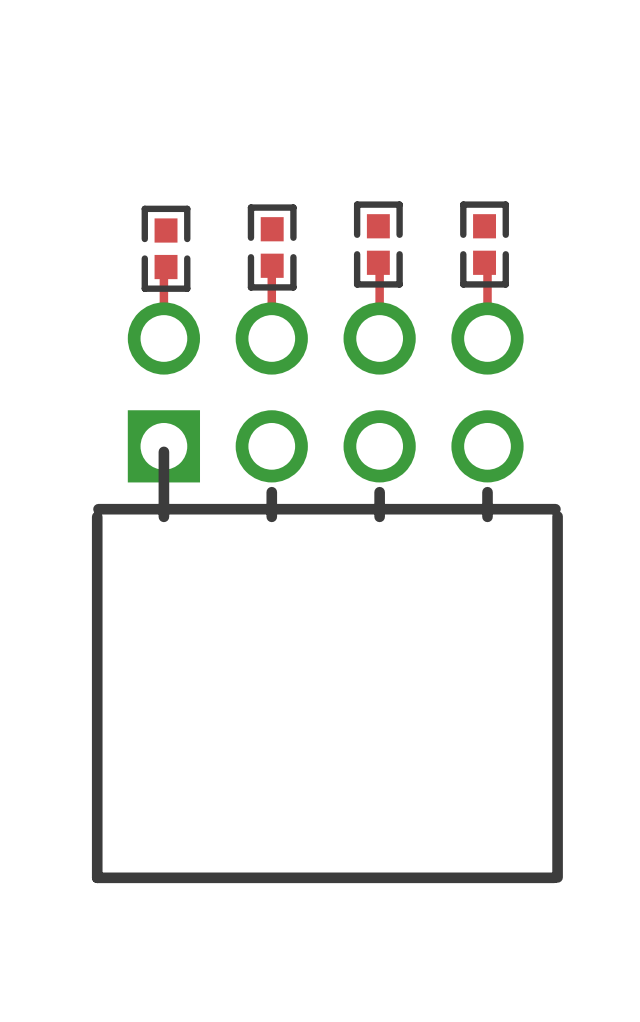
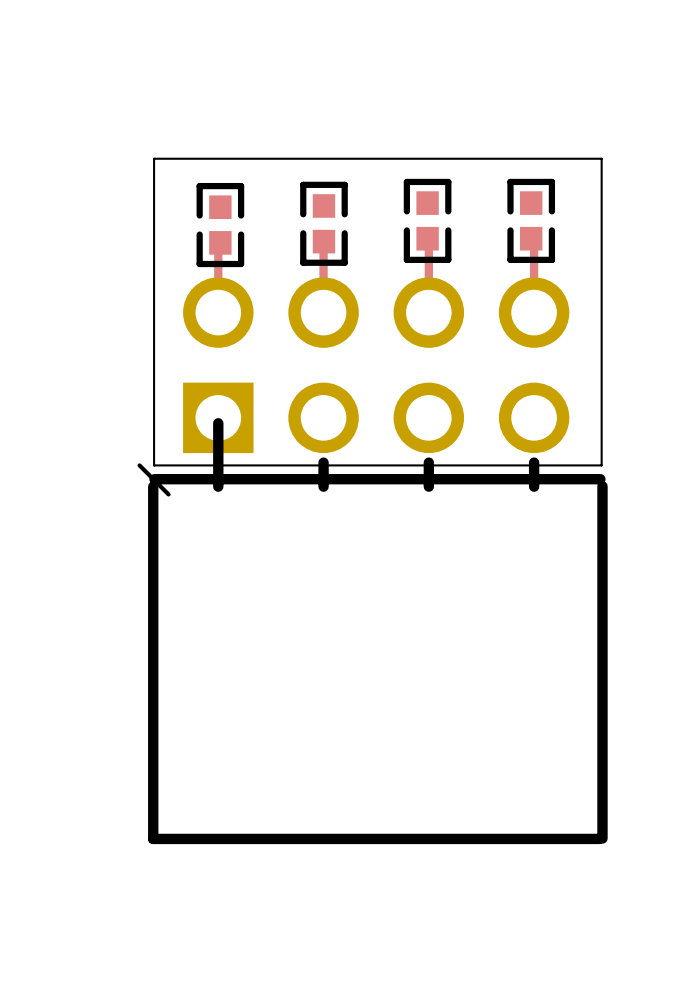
board edge: none -> (154, 158) (601, 158) (601, 465) (154, 465) (154, 158)
board edge: none -> (139, 465) (168, 494)

